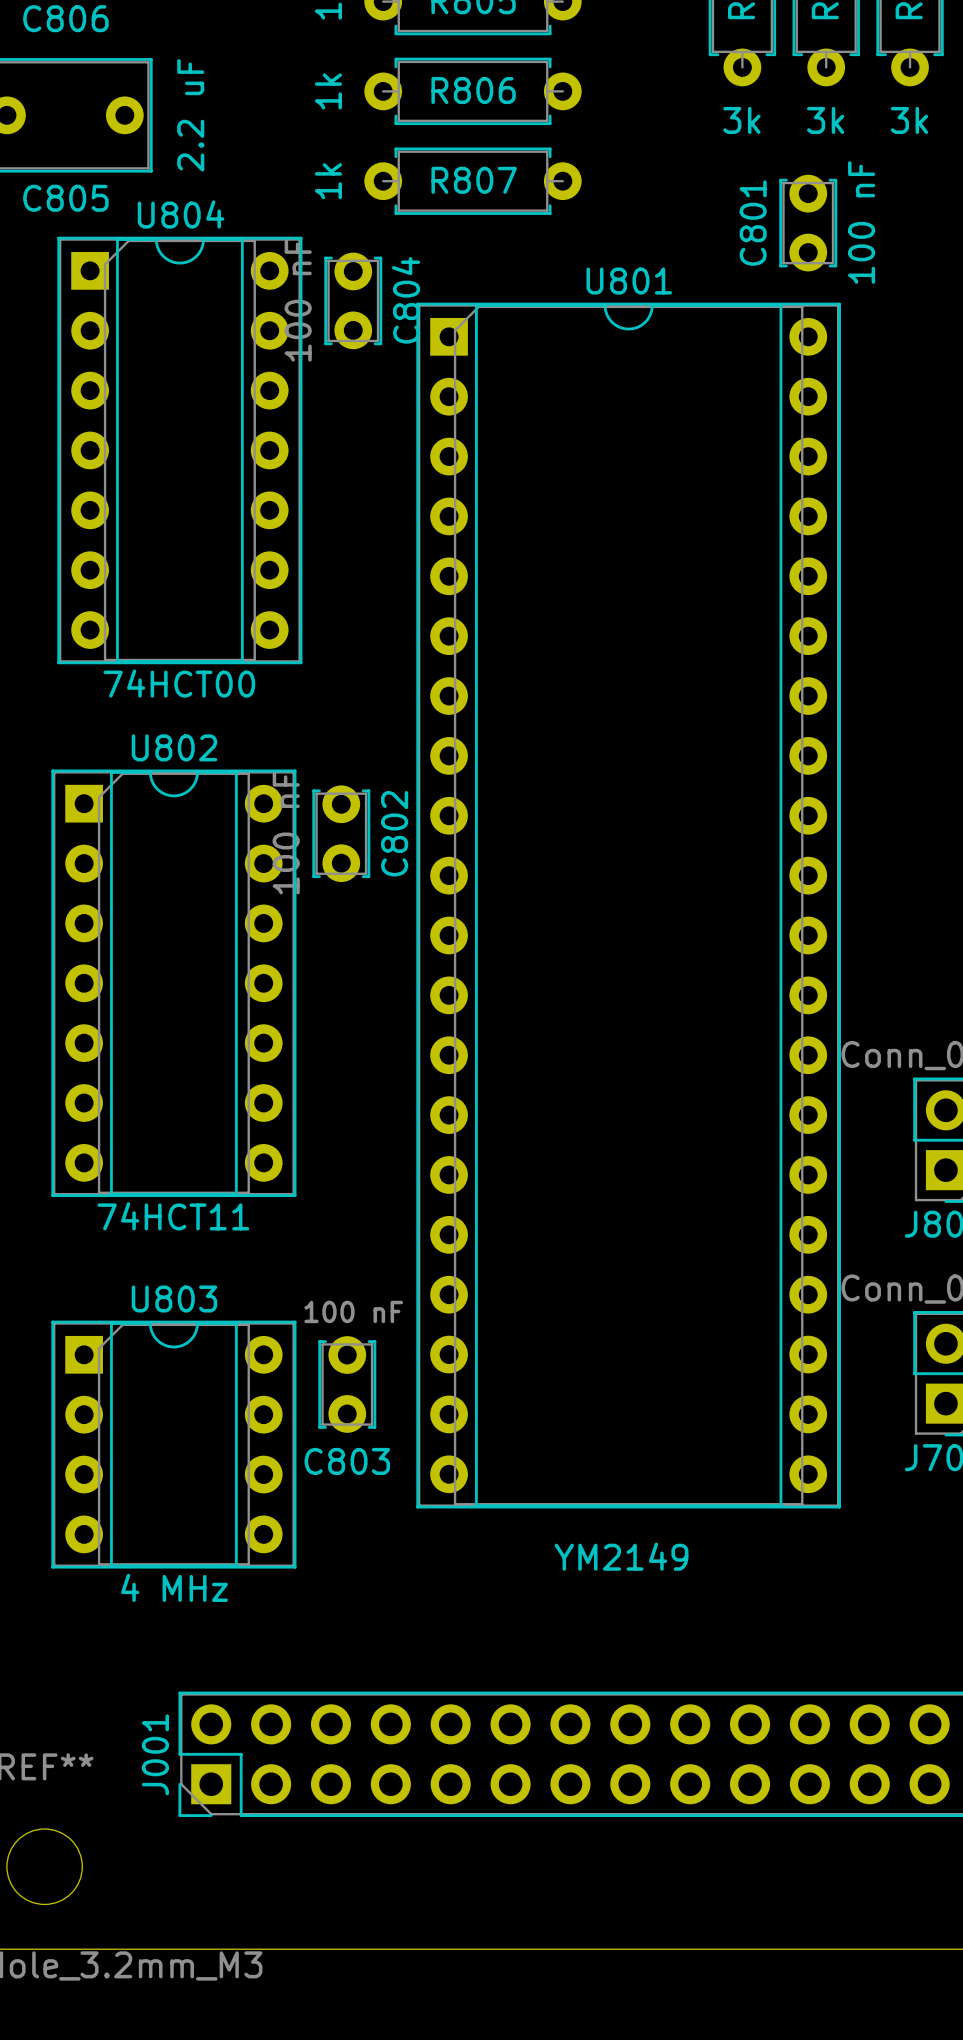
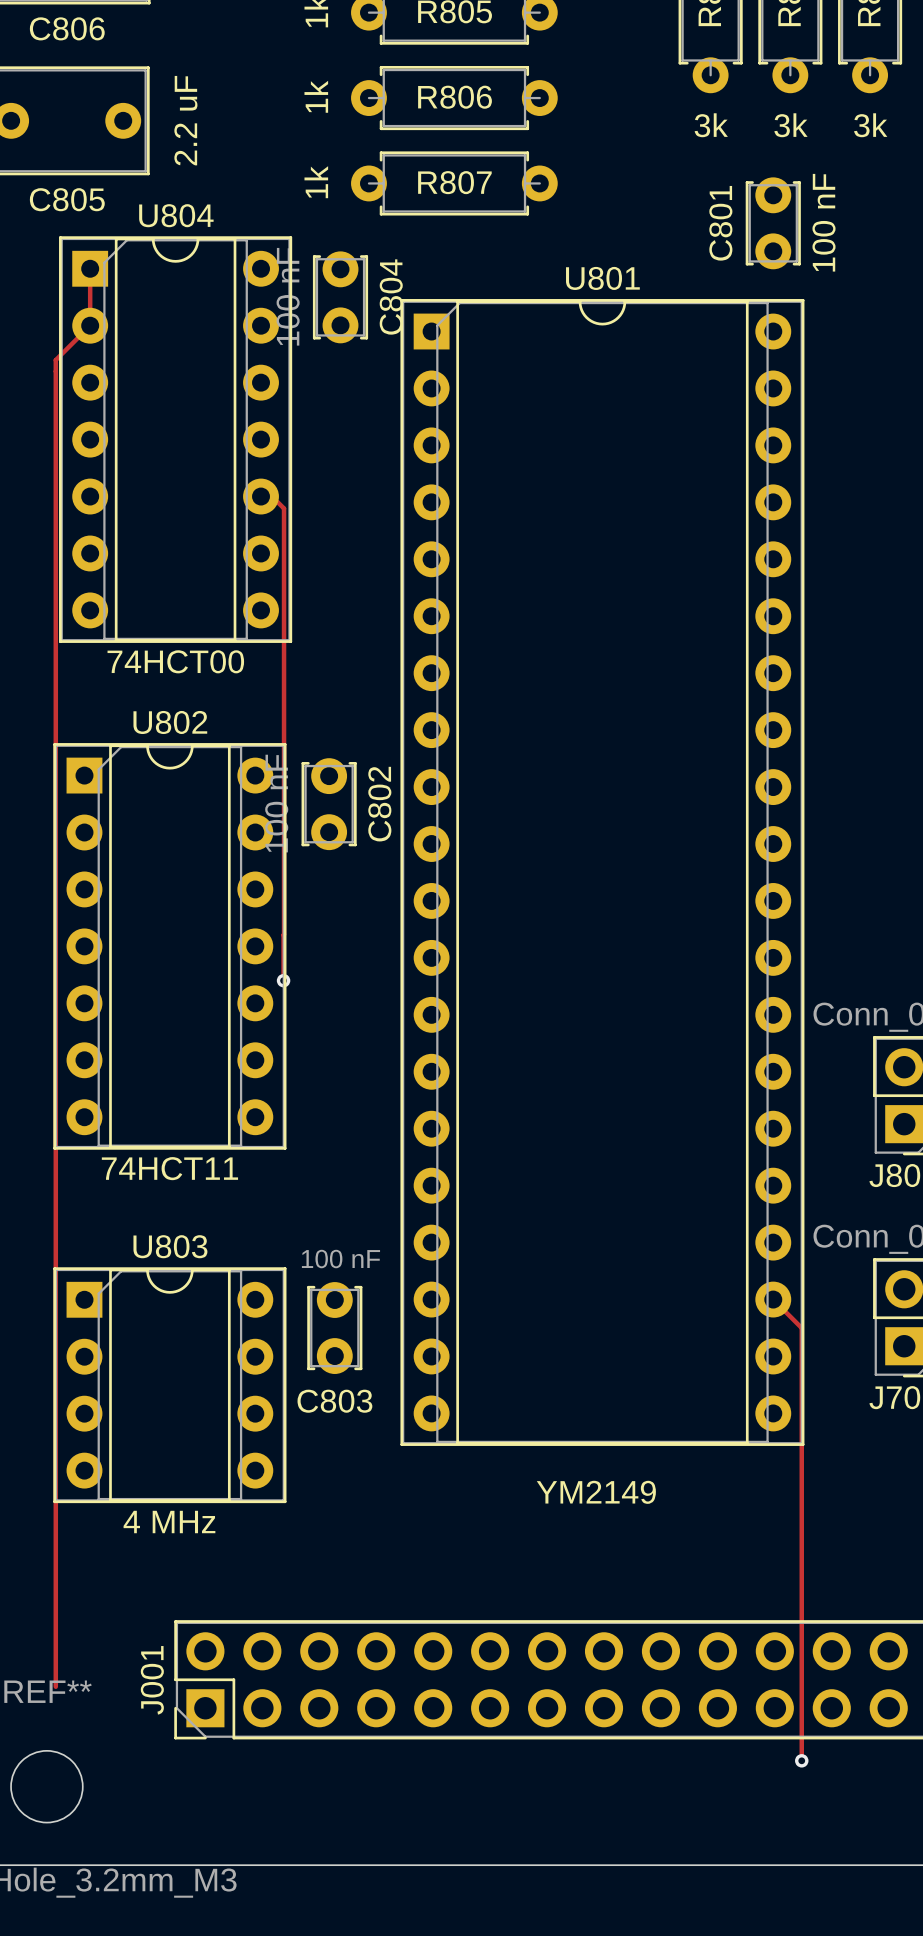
track: none -> (90, 268) (90, 325) (55, 360) (55, 1686)
track: none -> (261, 496) (272, 496) (284, 508) (283, 980)
via: none -> (283, 980)
track: none -> (773, 1299) (801, 1328) (801, 1760)
via: none -> (801, 1760)

